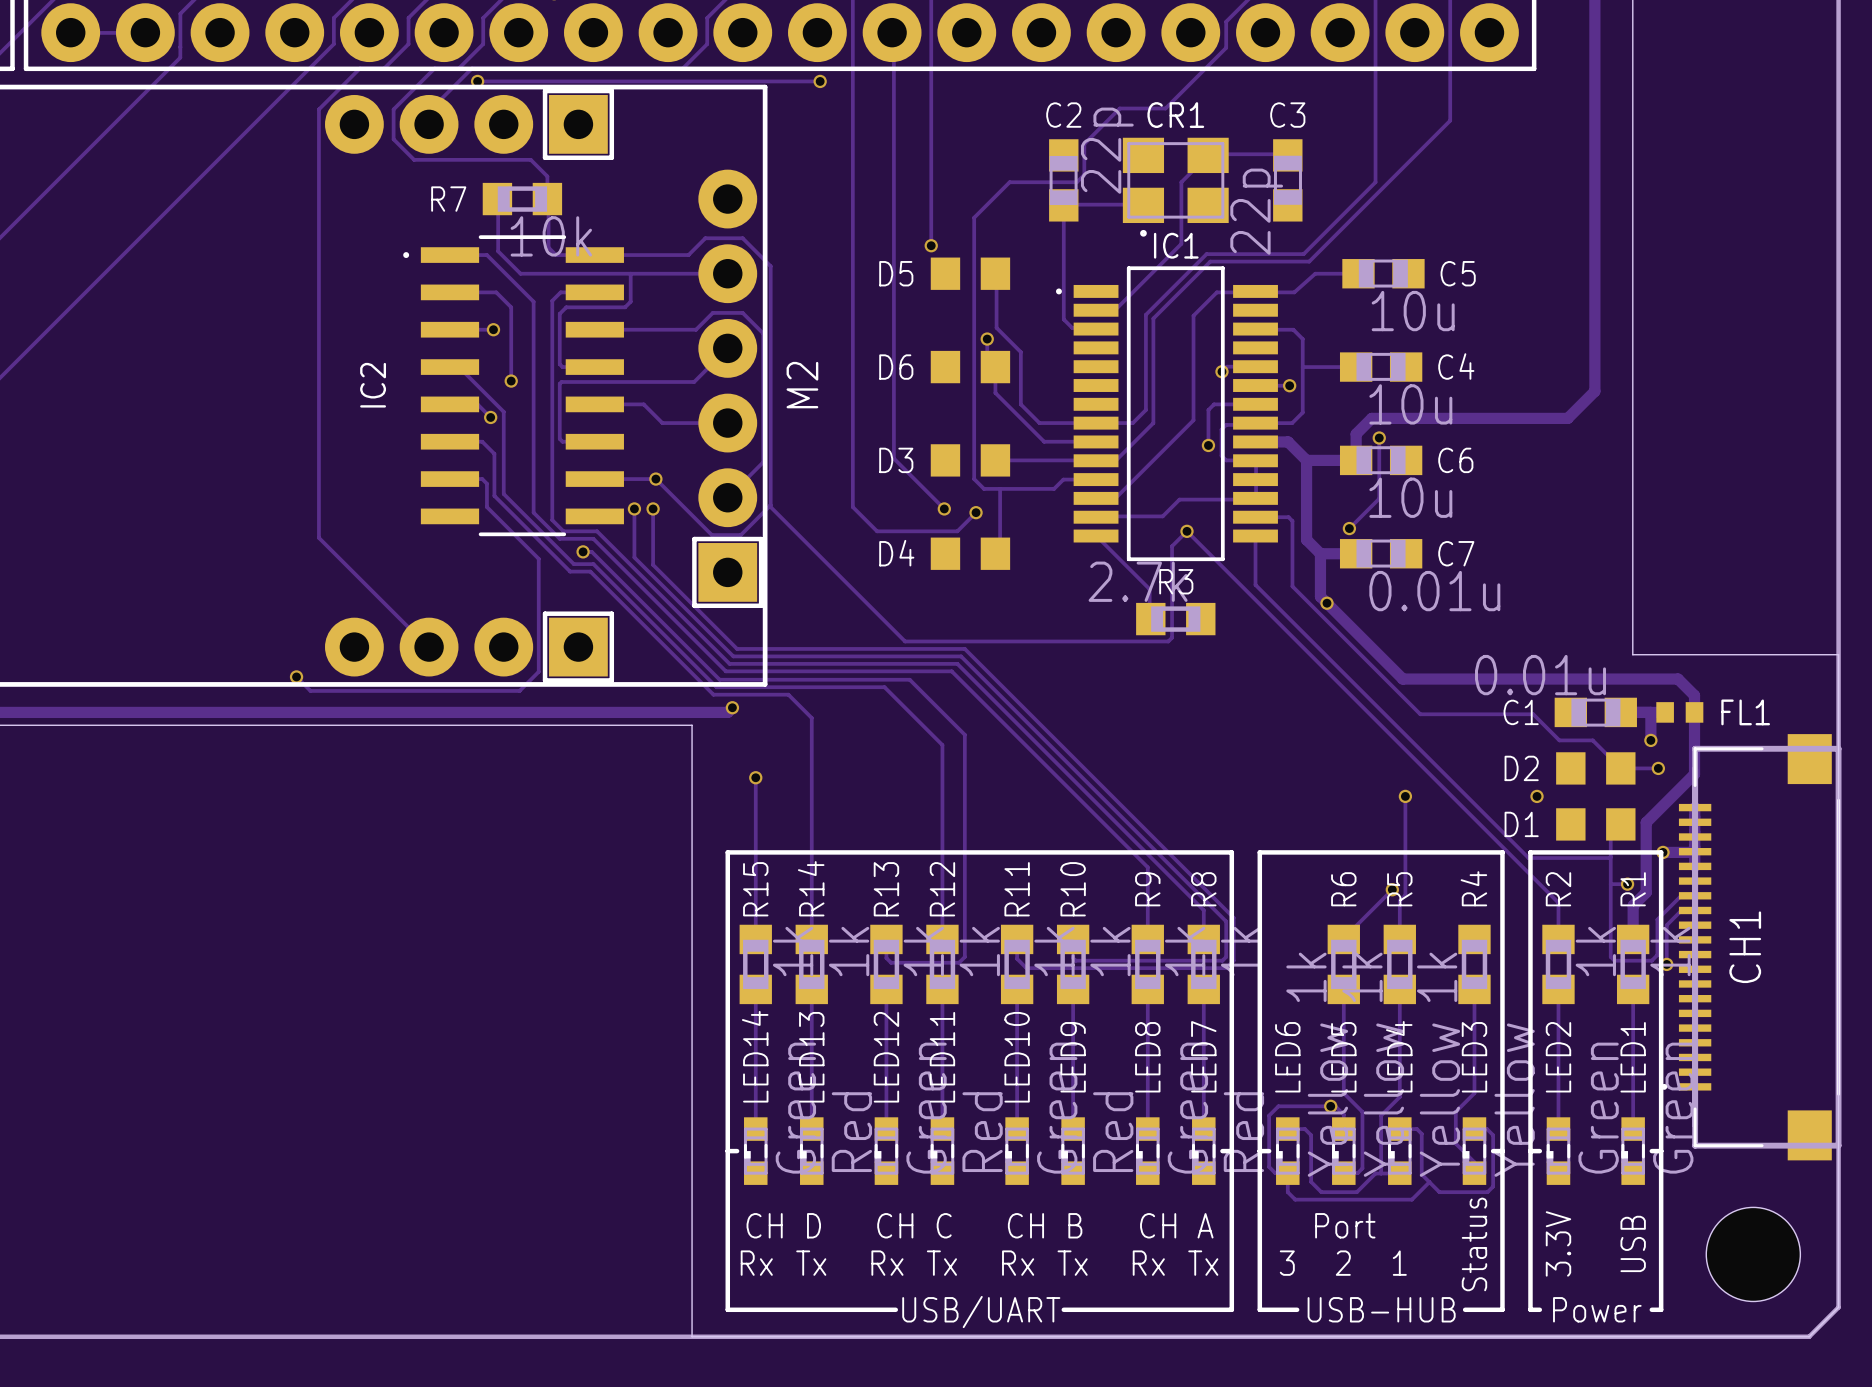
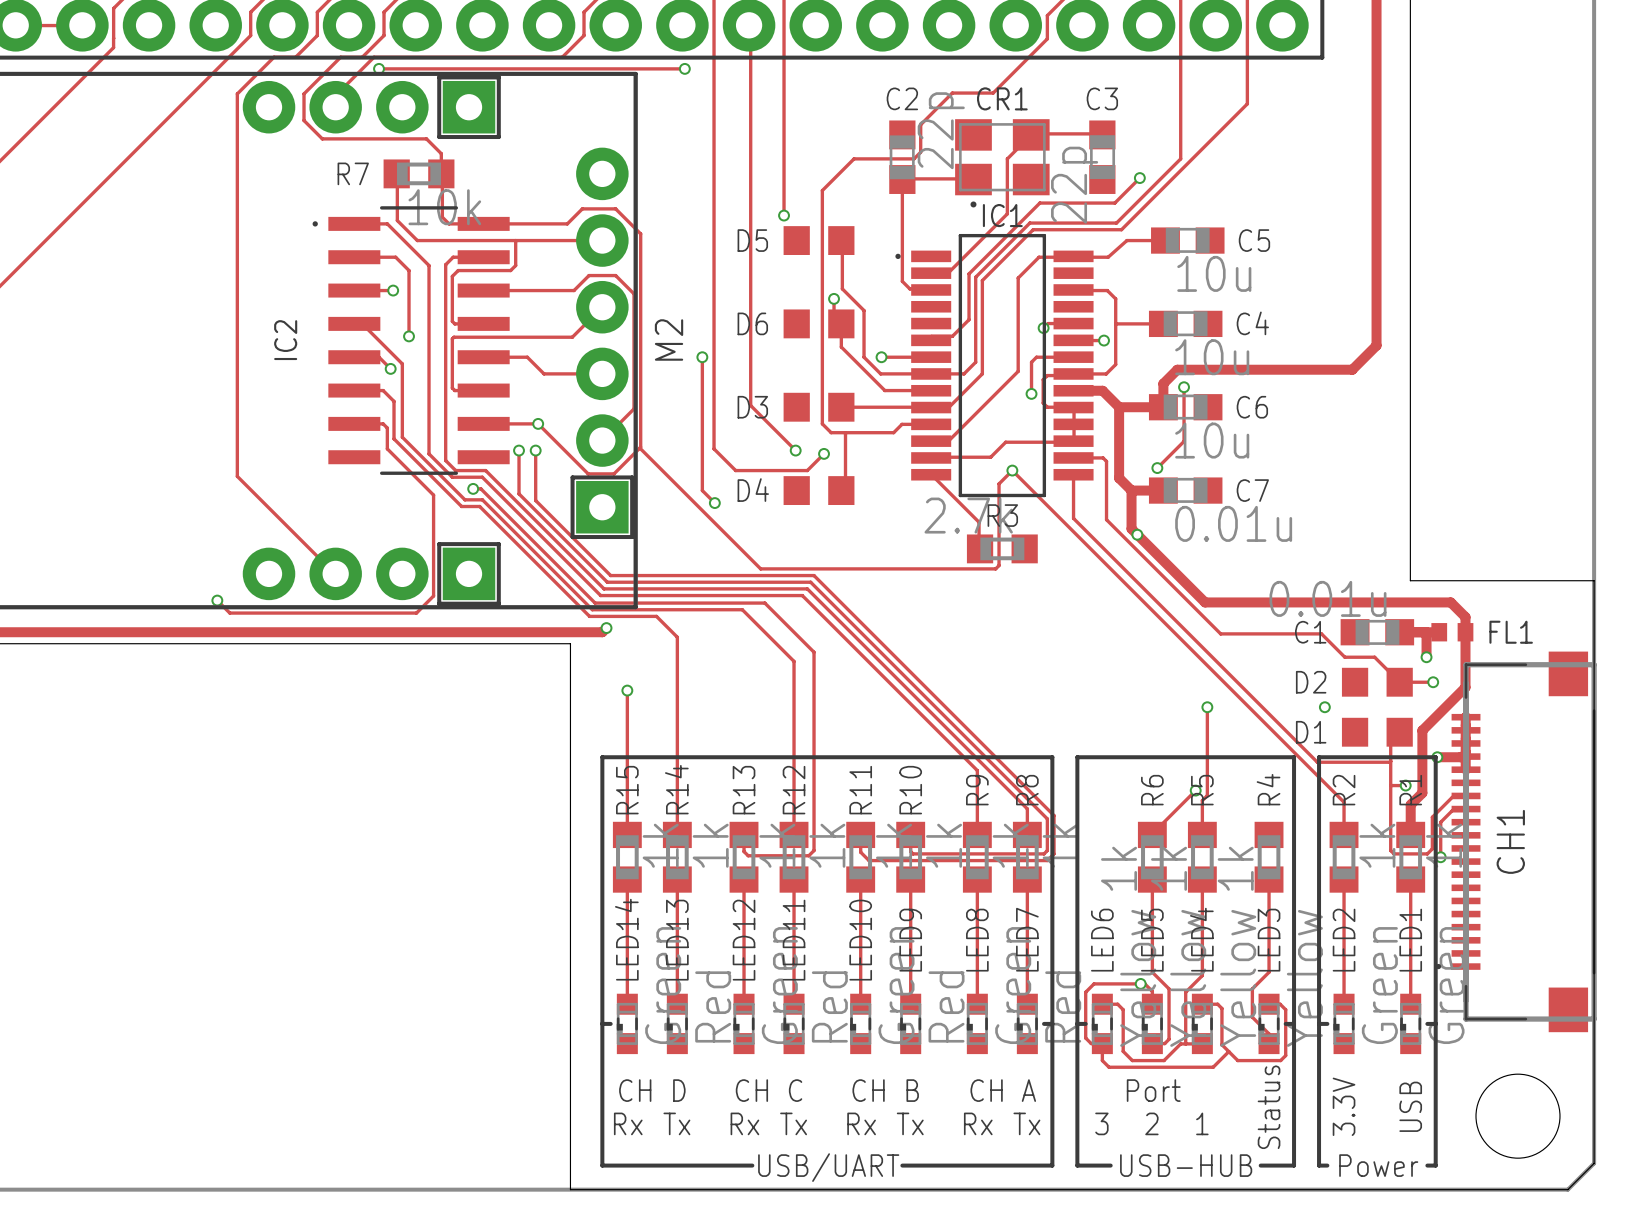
track: none -> (1139, 178) (1114, 203) (1039, 203) (969, 273) (969, 319) (952, 336) (931, 336) (931, 340)
via: none -> (1139, 178)
track: none -> (702, 357) (702, 490) (714, 503)
via: none -> (702, 357)
via: none -> (881, 357)
track: none -> (931, 357) (881, 357)
via: none -> (714, 503)

